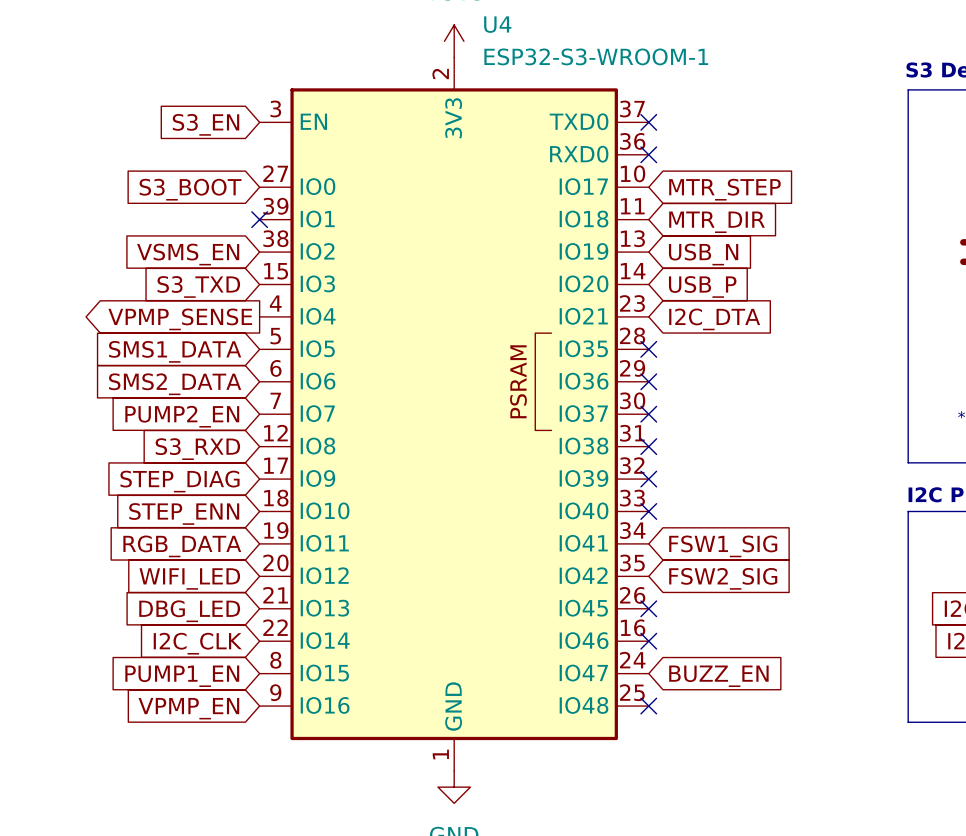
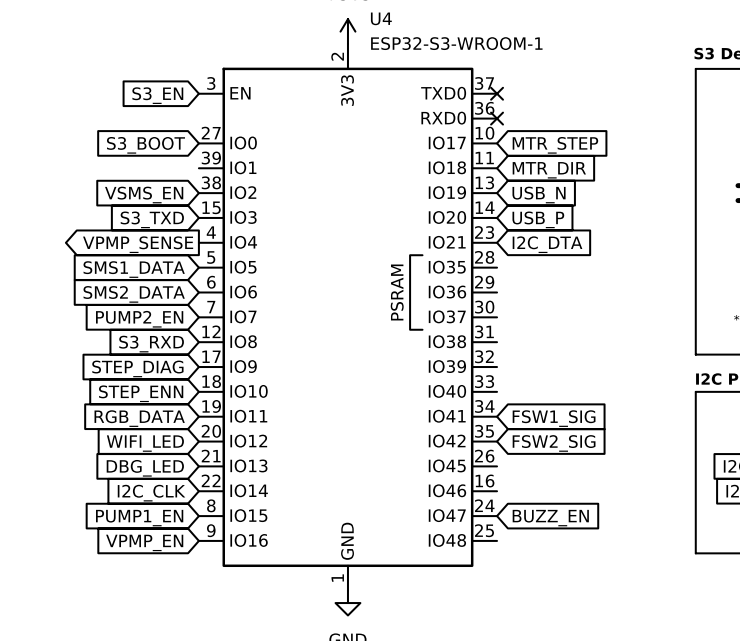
no-connect mark: (259, 219) -> none
no-connect mark: (648, 349) -> none
no-connect mark: (648, 381) -> none
no-connect mark: (648, 414) -> none
no-connect mark: (648, 446) -> none
no-connect mark: (648, 479) -> none
no-connect mark: (648, 511) -> none
no-connect mark: (648, 608) -> none
no-connect mark: (648, 641) -> none
no-connect mark: (648, 706) -> none

